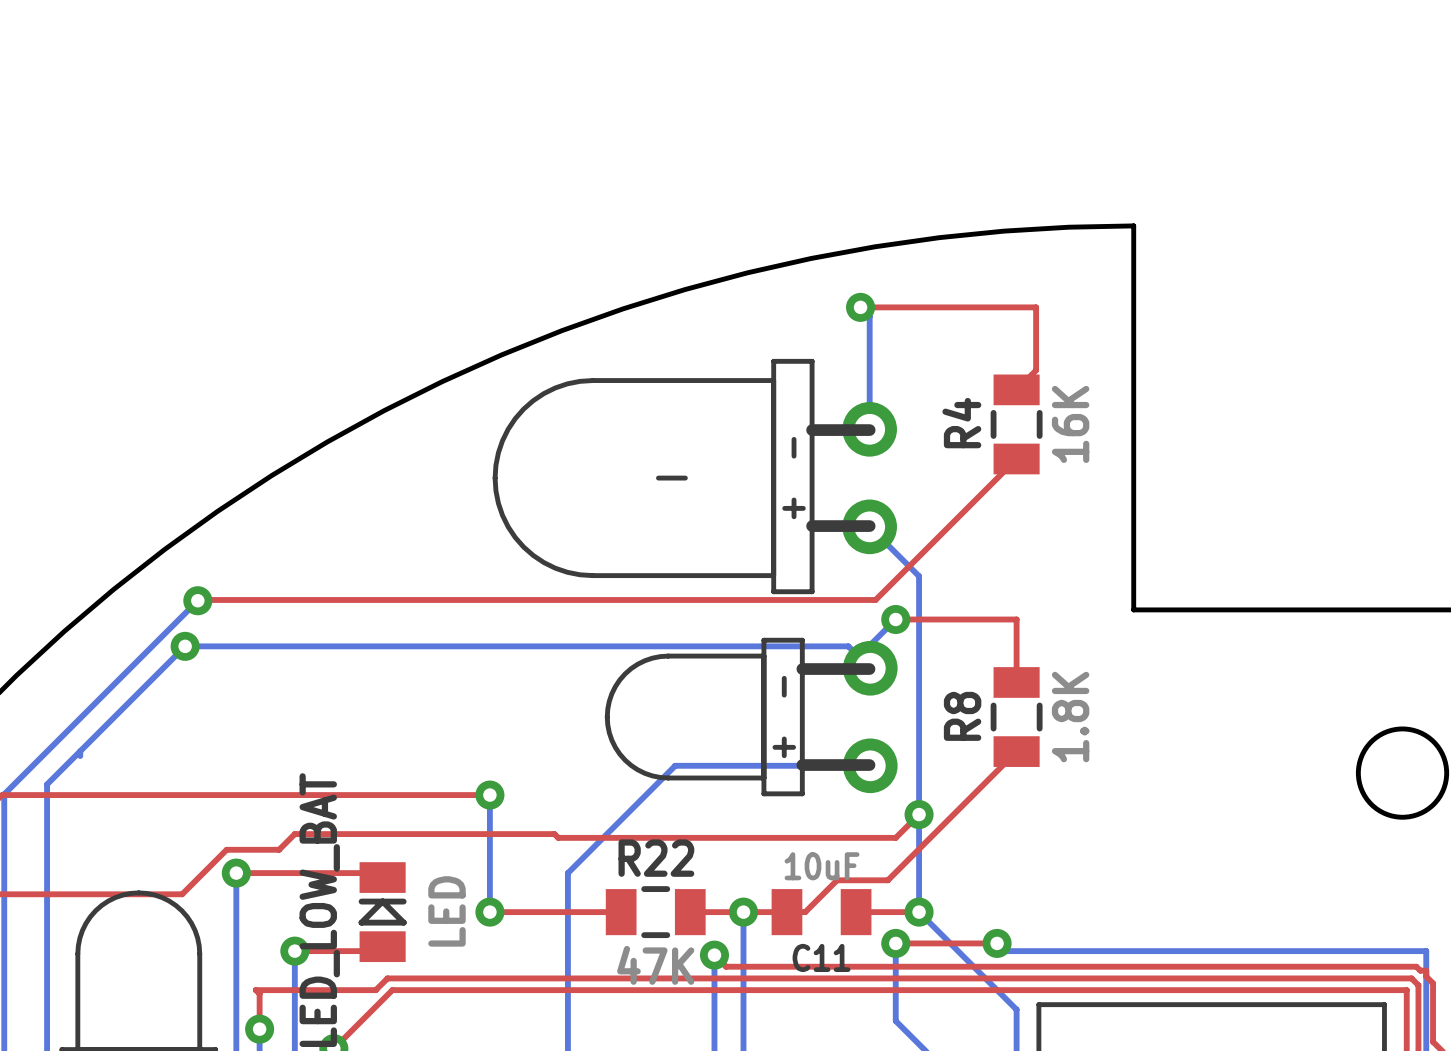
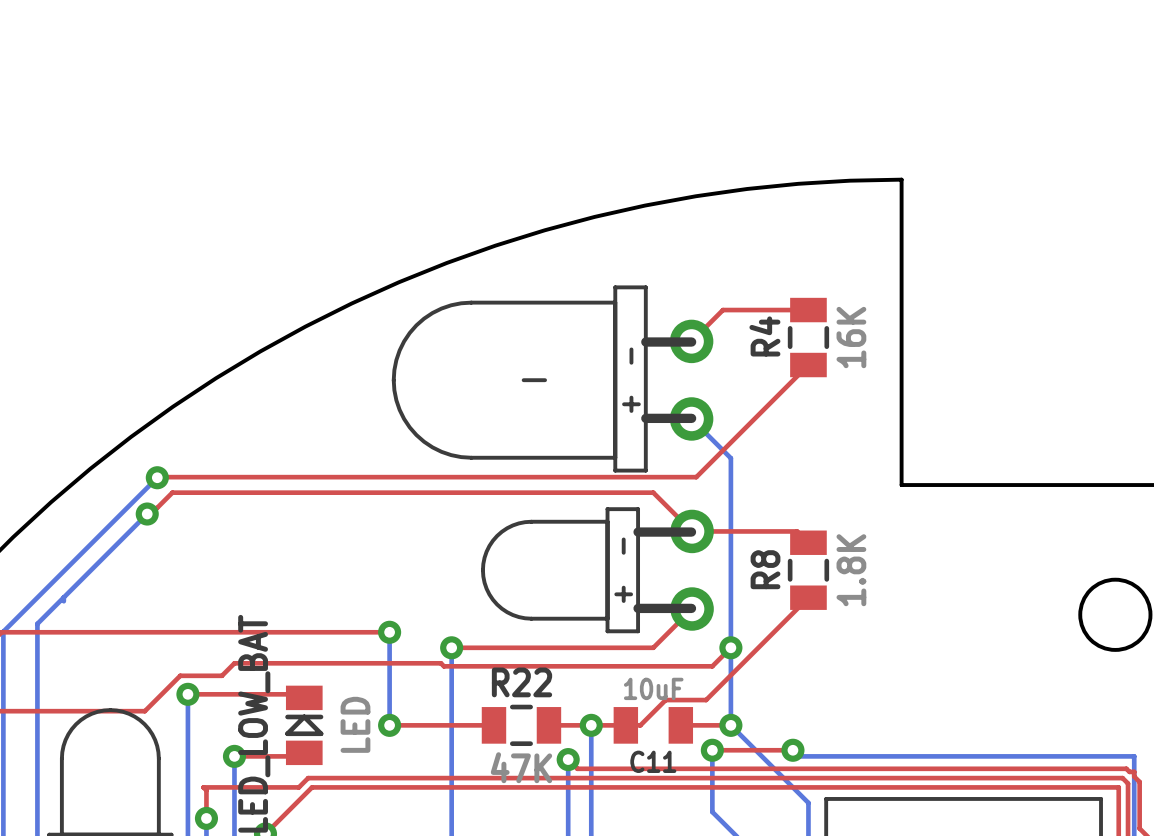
top track: (860, 307) (1036, 307) (1036, 370) (1016, 389) -> (691, 341) (722, 310) (808, 310)
bottom track: (860, 307) (869, 316) (869, 429) -> none
via: (860, 307) -> none
top track: (895, 619) (1016, 619) (1016, 682) -> (147, 514) (153, 508) (156, 508) (172, 492) (653, 492) (692, 531) (797, 531) (808, 542)
bottom track: (895, 619) (870, 644) (870, 668) (848, 646) (185, 646) -> none
via: (895, 619) -> none
top track: none -> (692, 609) (653, 647) (451, 647)
bottom track: (870, 765) (675, 765) (567, 873) -> (451, 647) (451, 694)
via: none -> (451, 647)

